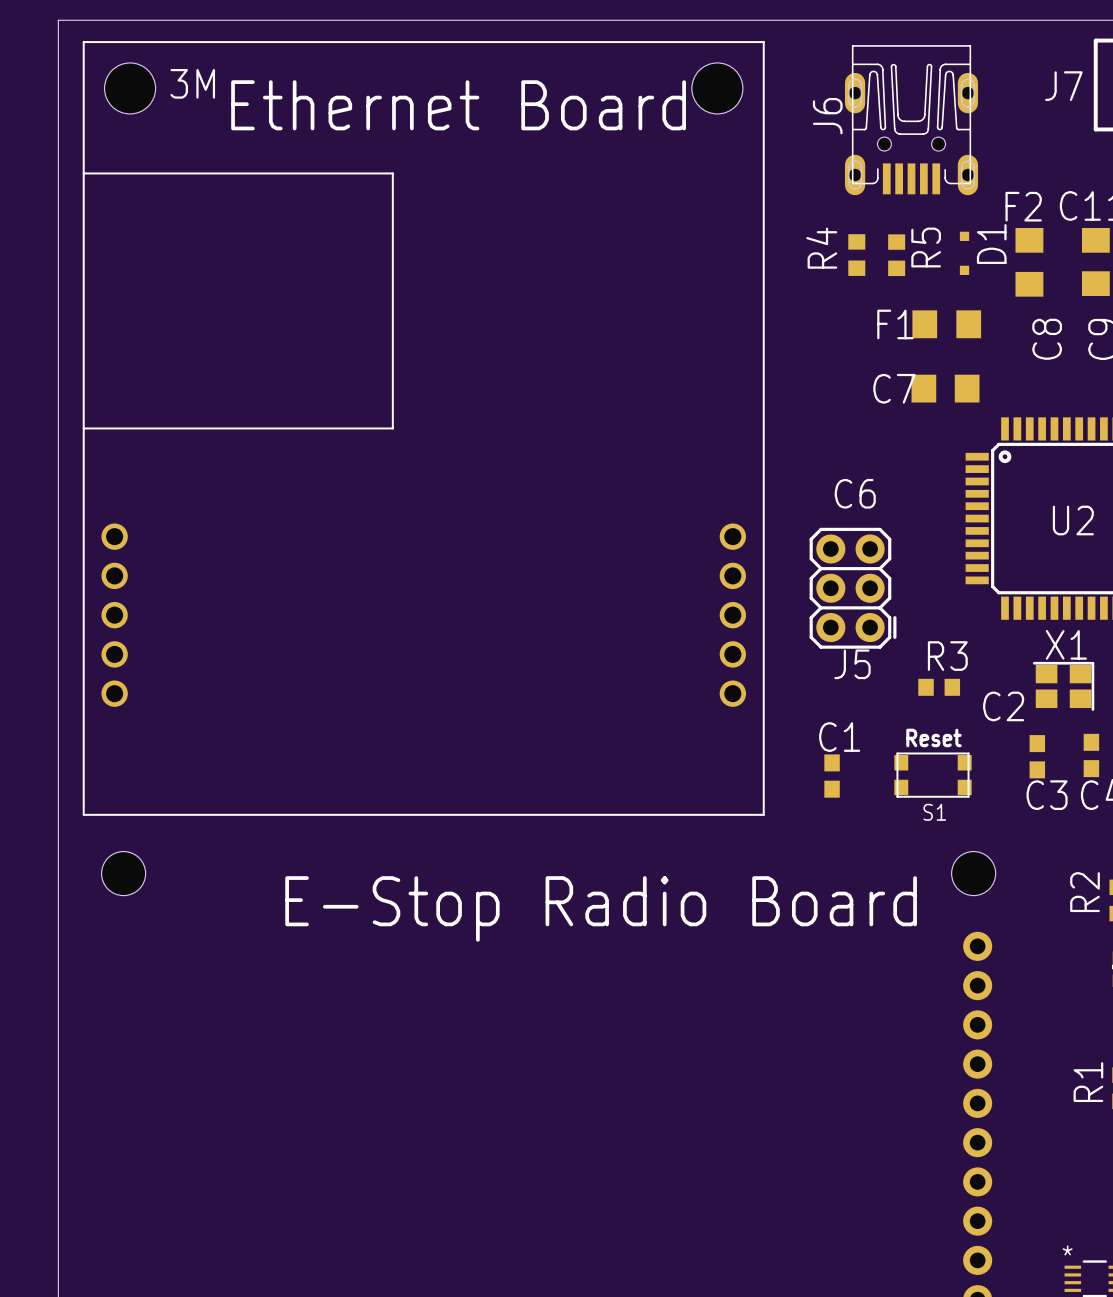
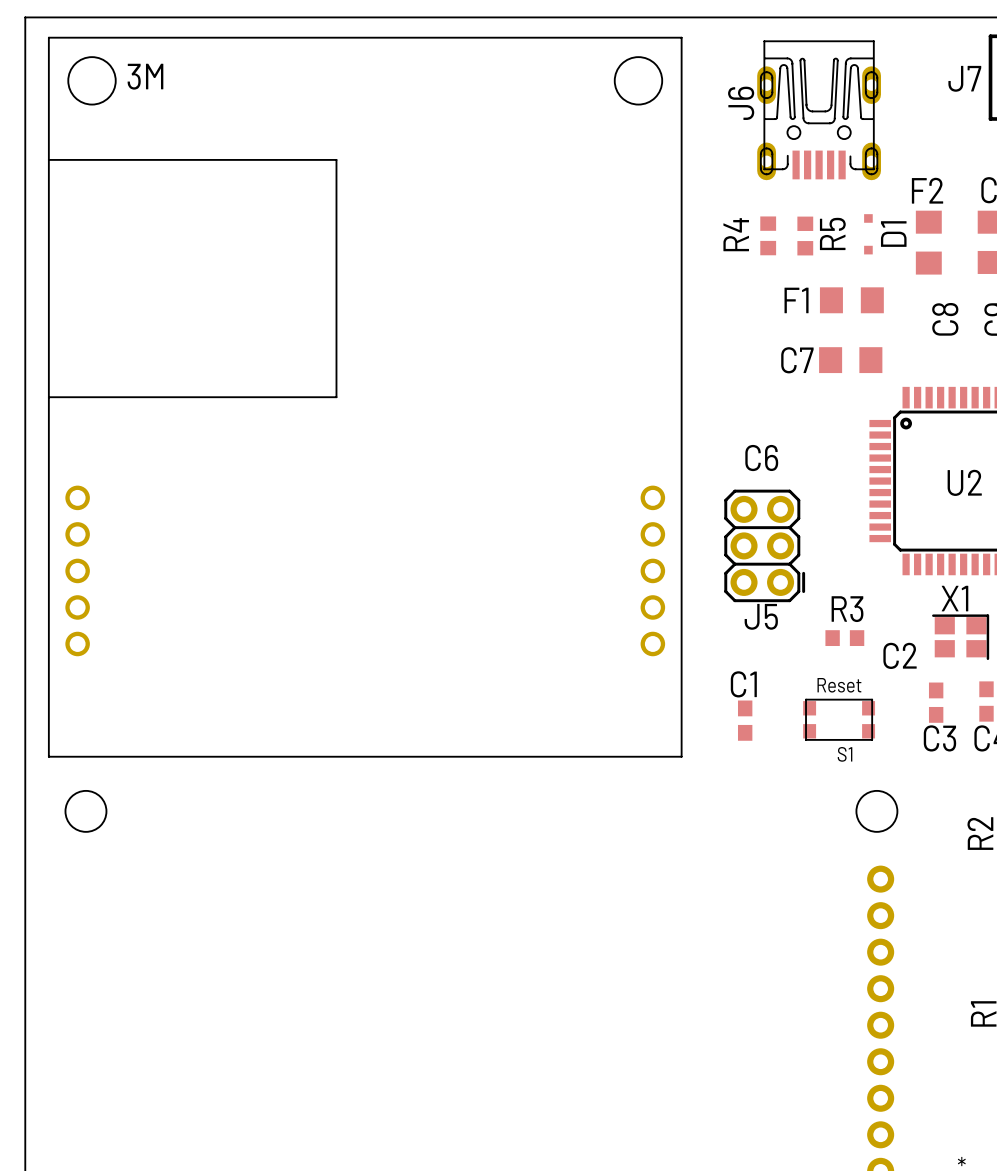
text: Ethernet Board (458, 105) -> none
text: E-Stop Radio Board (601, 908) -> none

